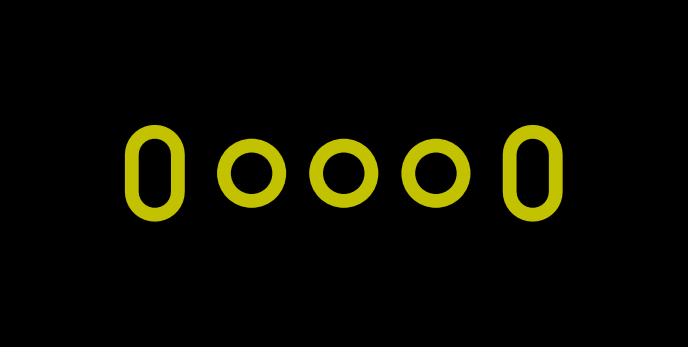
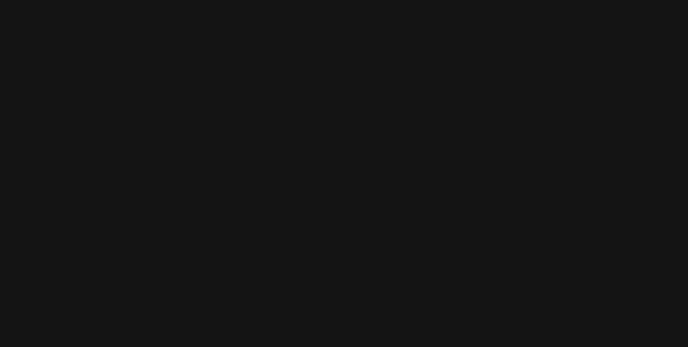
part: (343, 173) -> none

